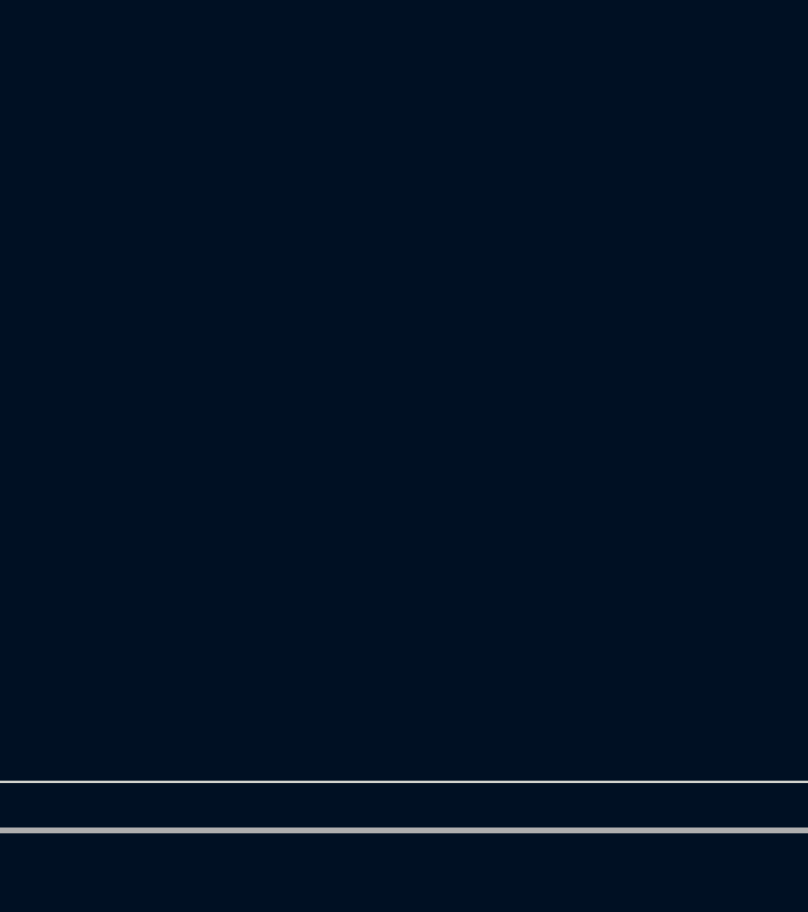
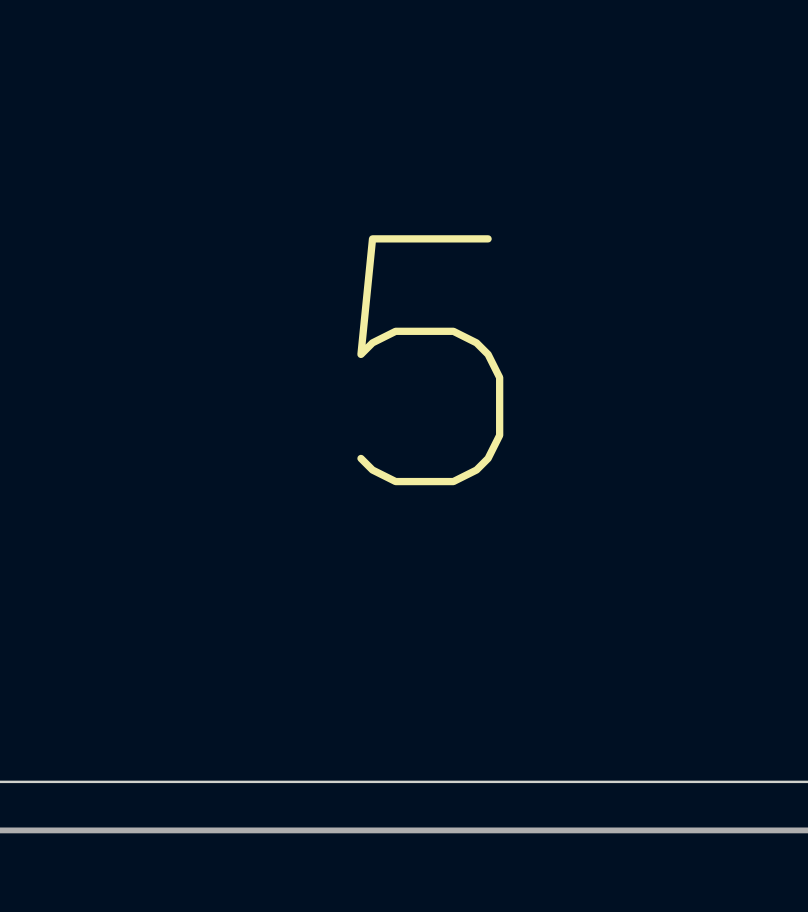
text: none -> 5 (430, 360)

